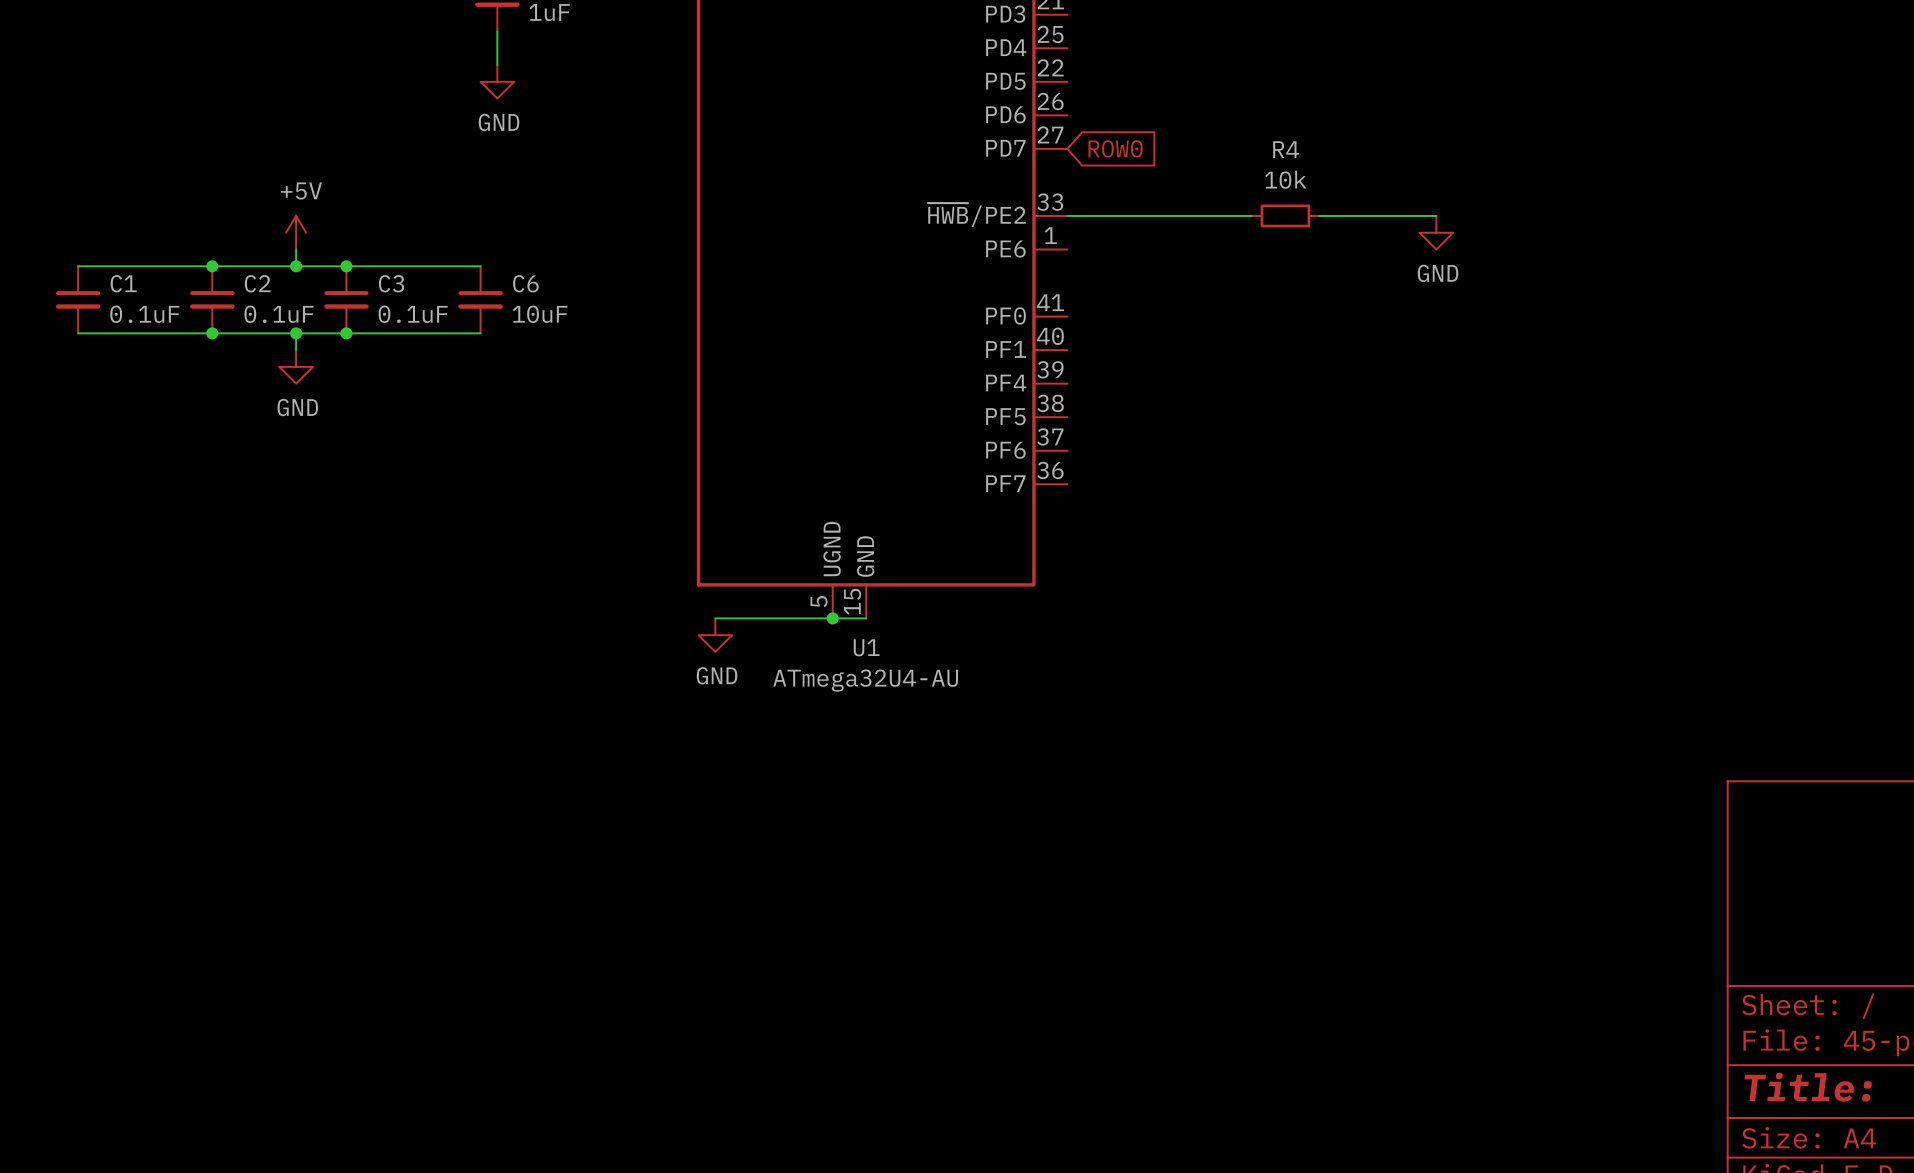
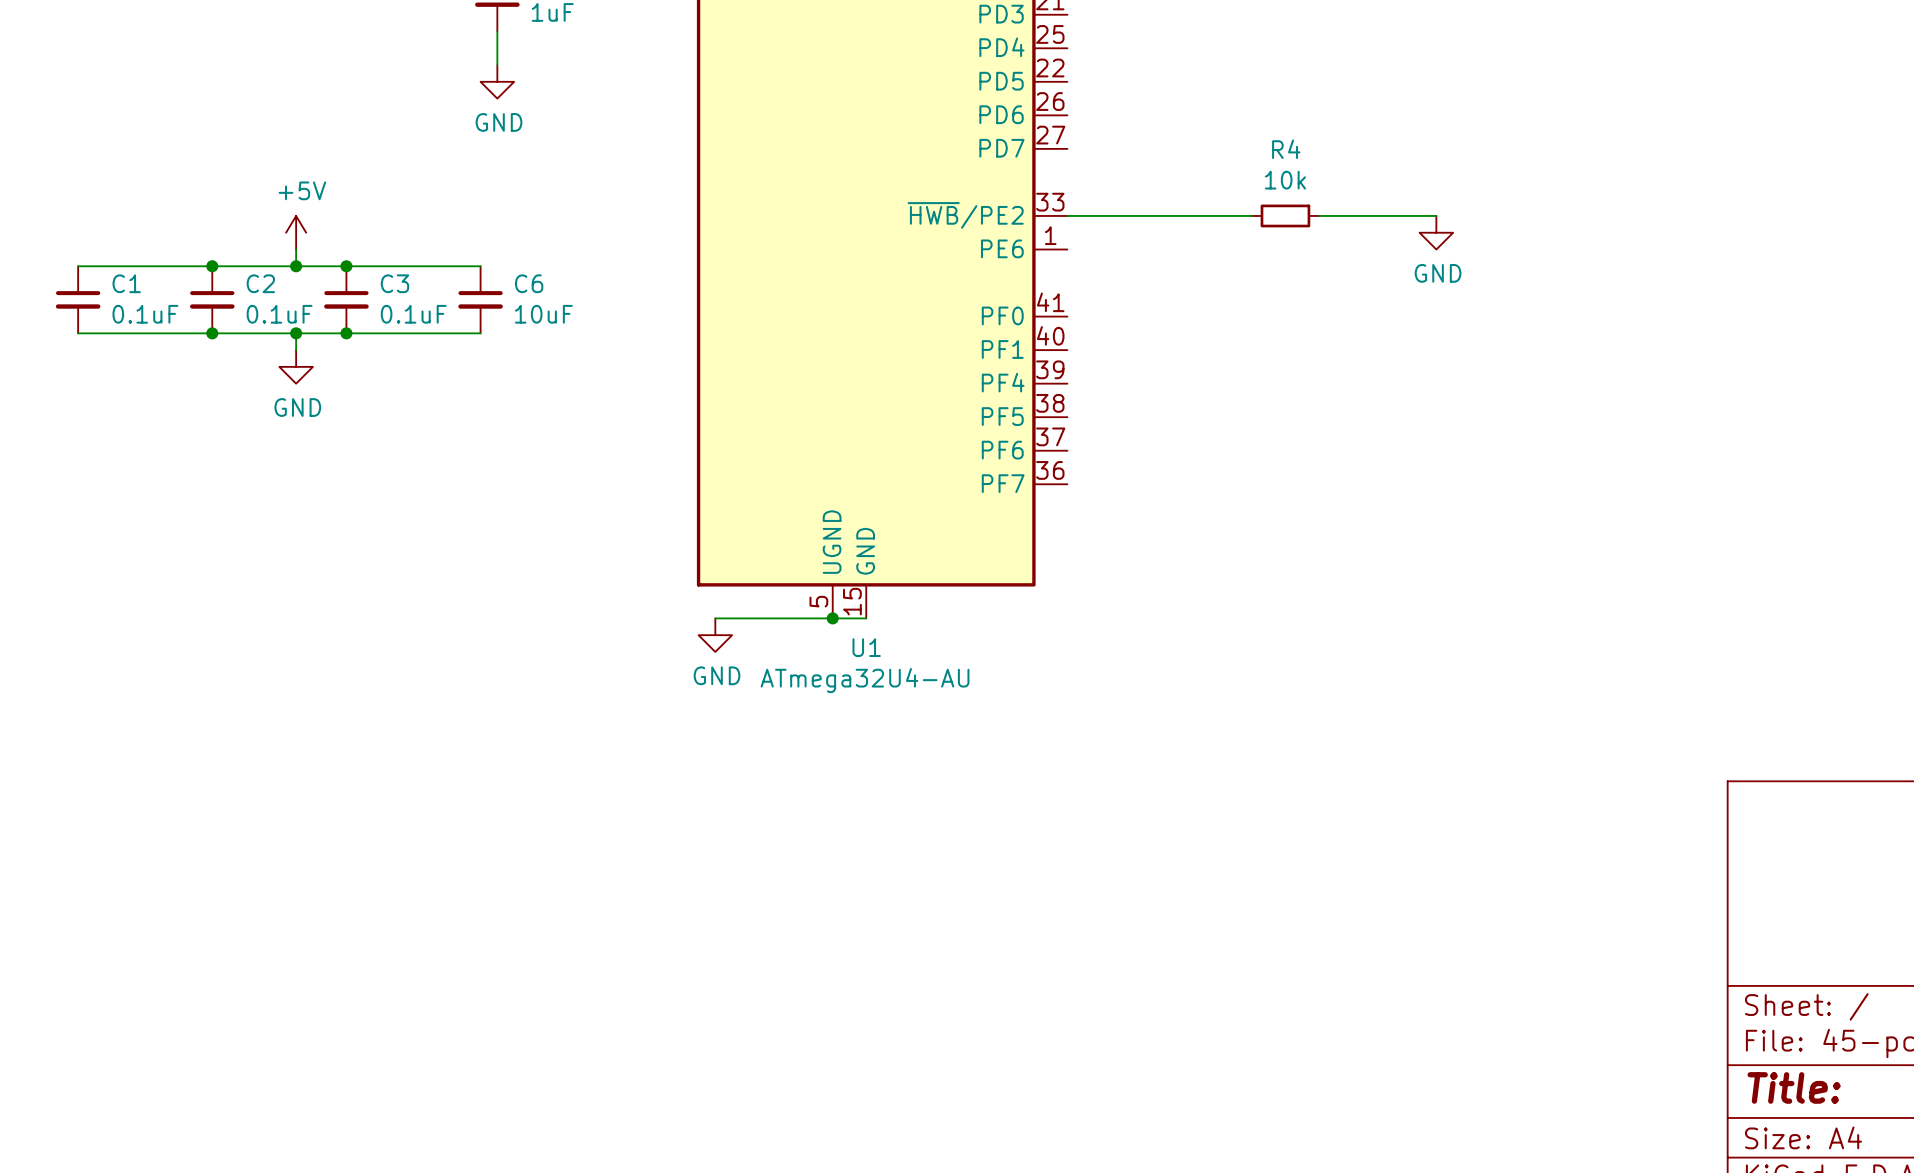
global label: ROW0 (1115, 148) -> none

